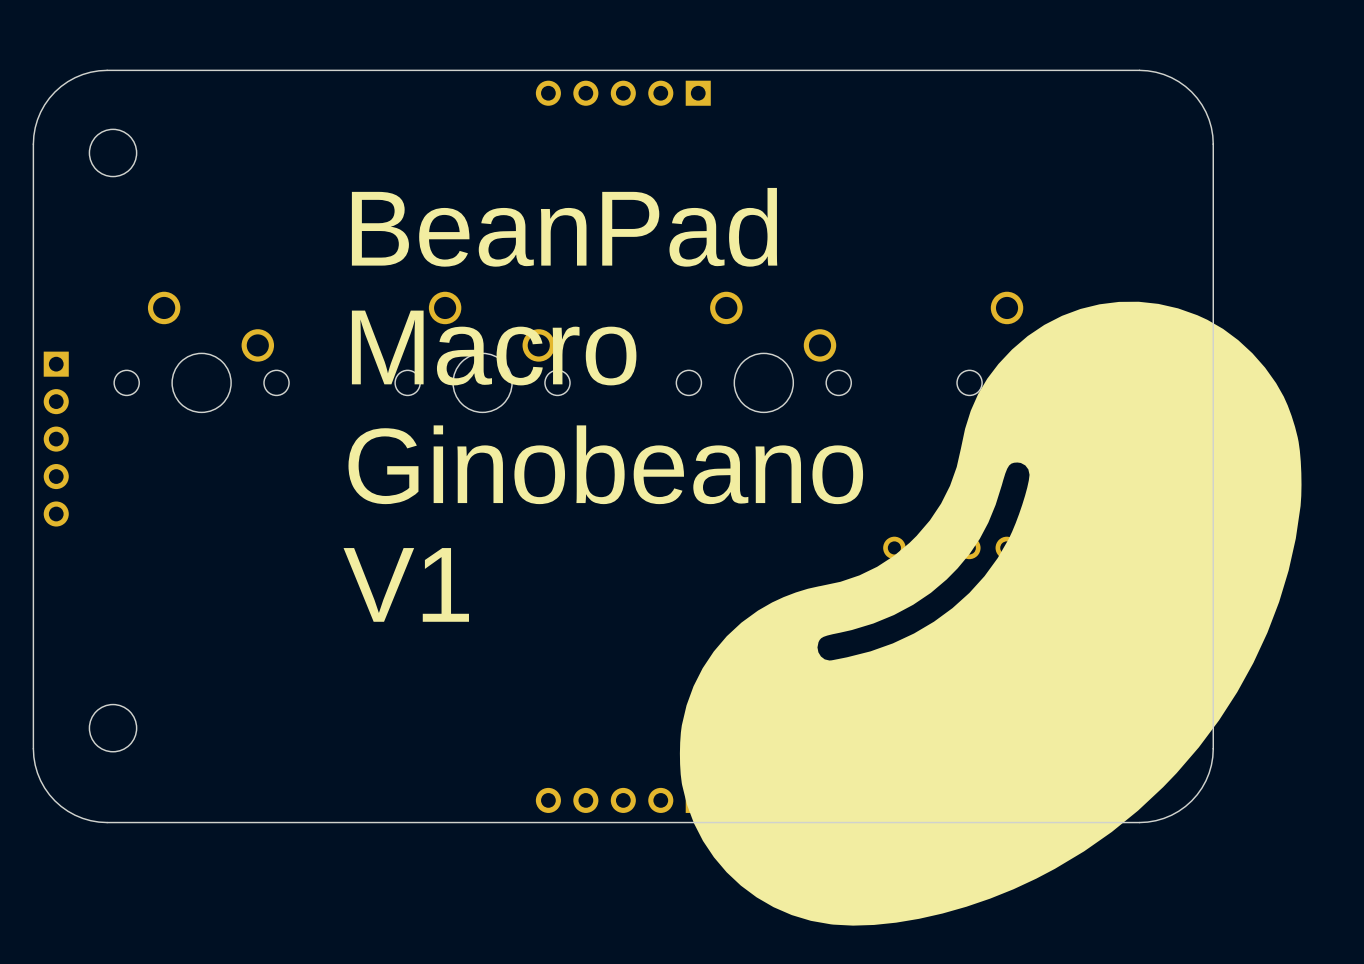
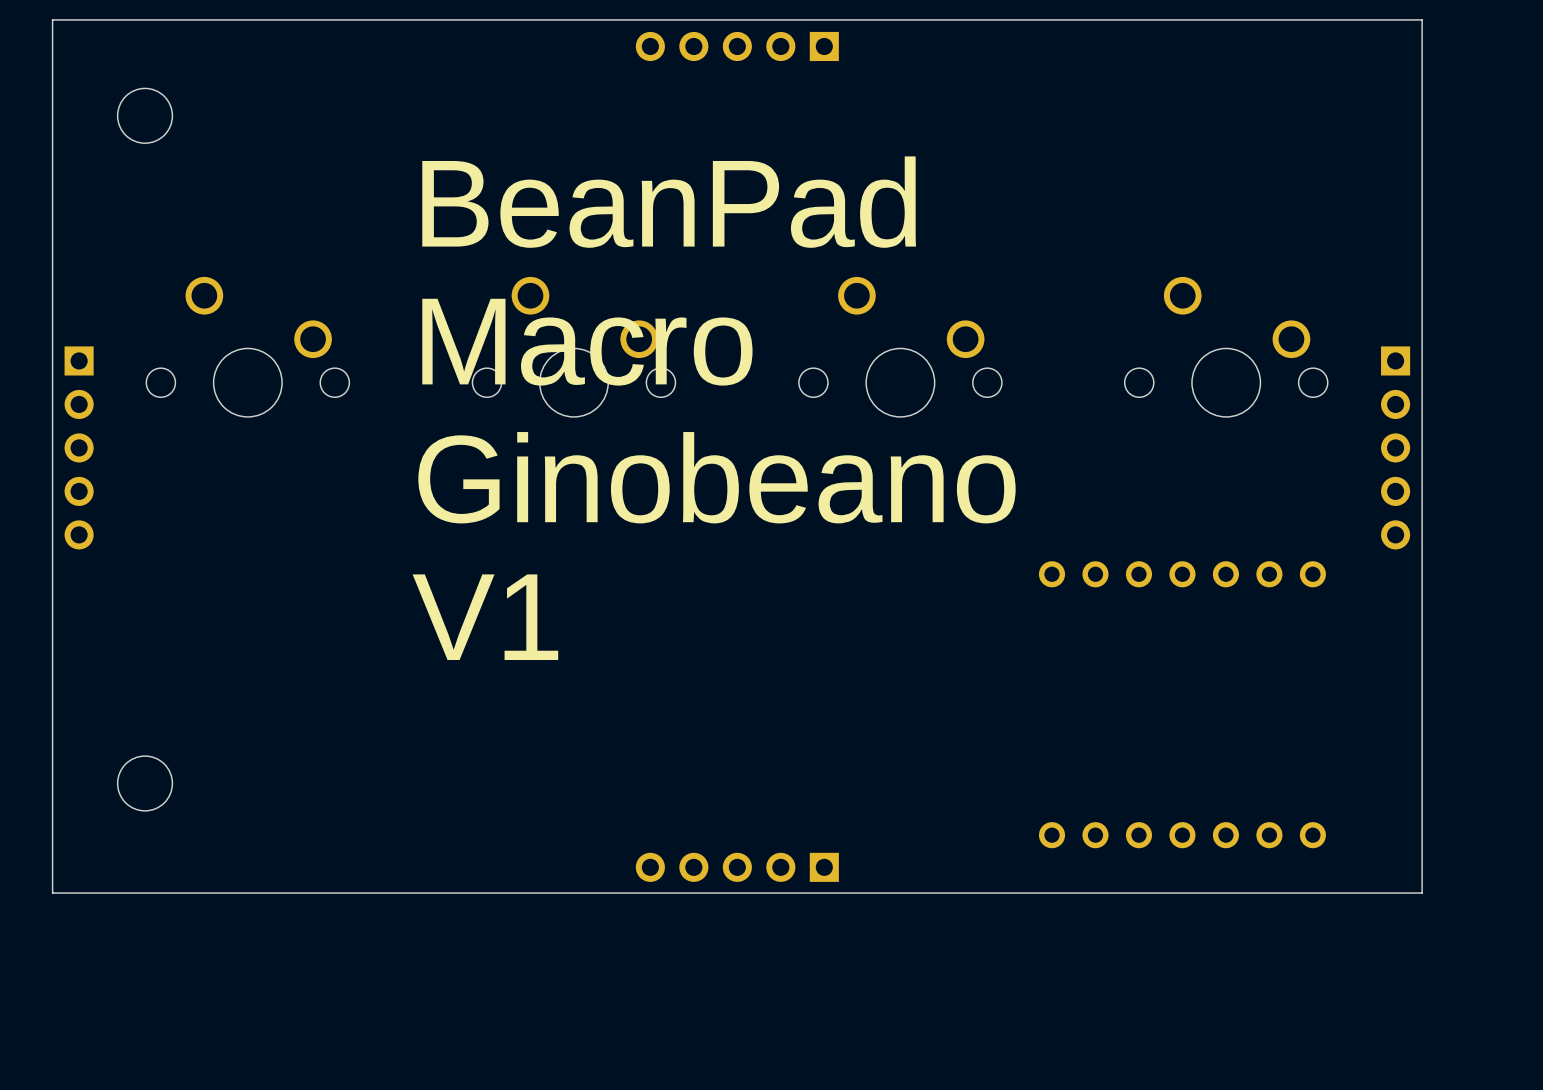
board edge: (107, 70) (82, 74) (67, 81) (54, 91) (40, 112) (35, 127) (33, 144) -> (138, 19) (52, 19) (52, 105)
board edge: (1139, 70) (1155, 72) (1171, 77) (1191, 91) (1201, 104) (1209, 119) (1213, 144) -> (1336, 19) (1422, 19) (1422, 105)
part: (990, 613) -> none
board edge: (33, 748) (35, 765) (40, 780) (54, 800) (67, 811) (82, 818) (107, 822) -> (52, 807) (52, 893) (138, 893)
board edge: (1213, 748) (1209, 773) (1201, 788) (1191, 800) (1178, 811) (1163, 818) (1139, 822) -> (1422, 807) (1422, 893) (1336, 893)

